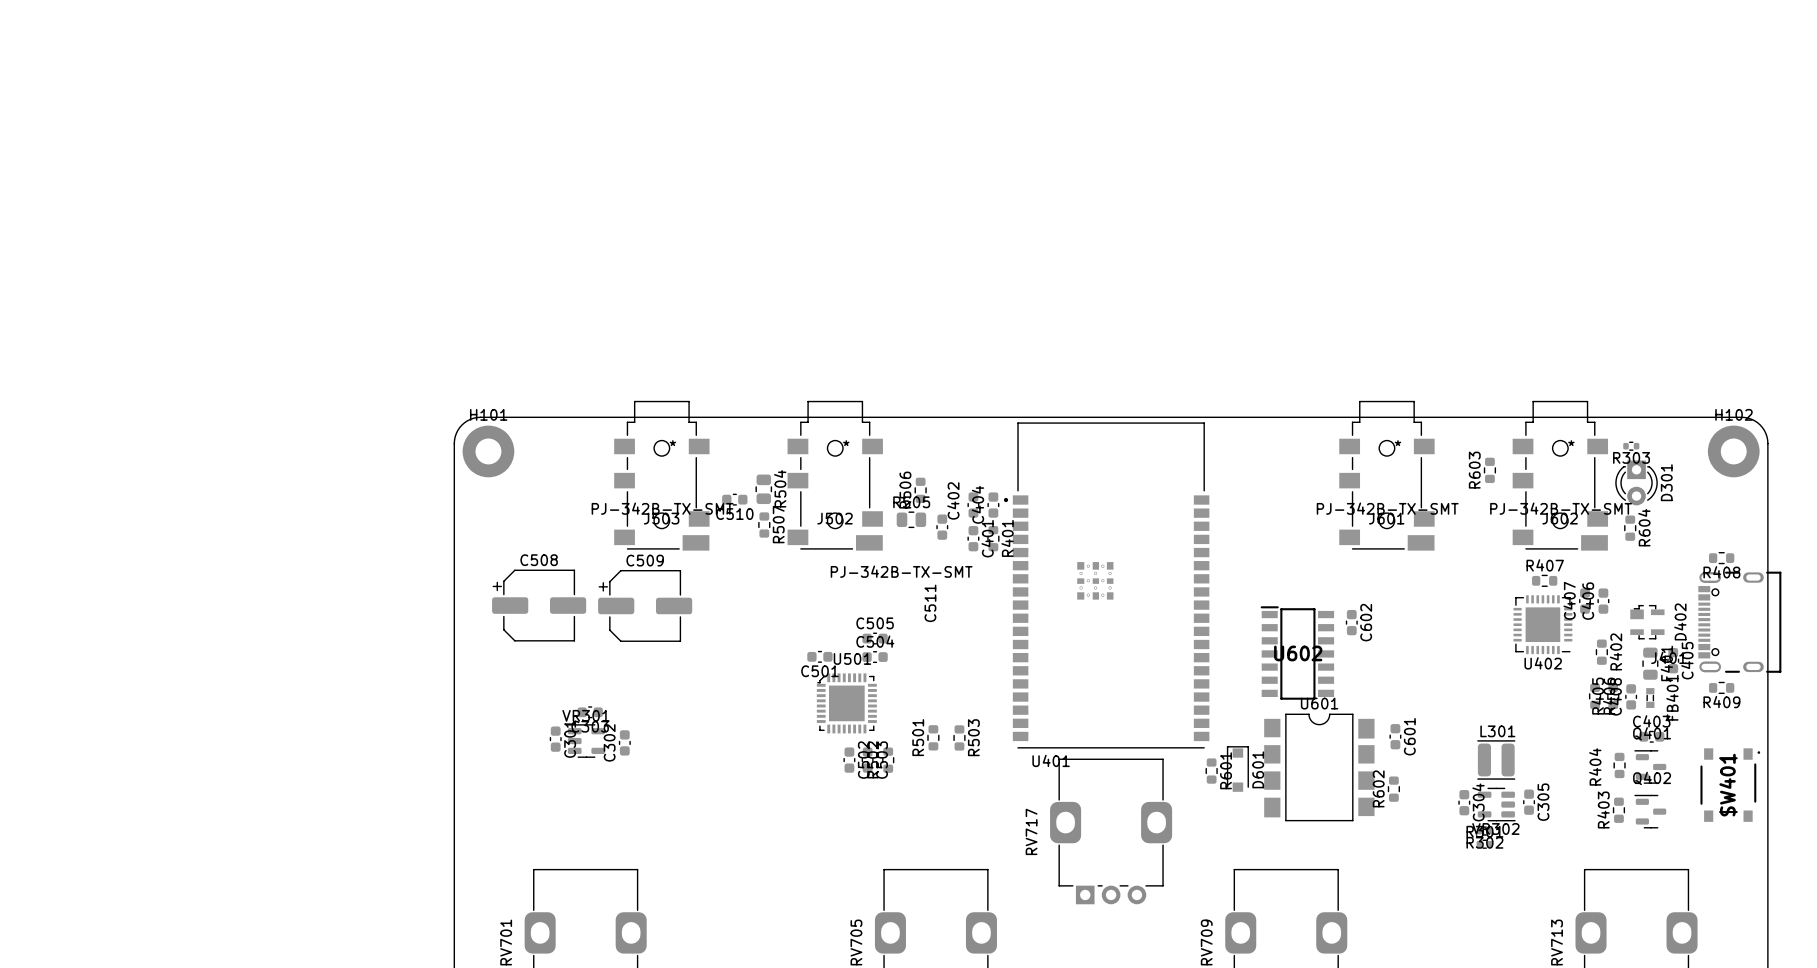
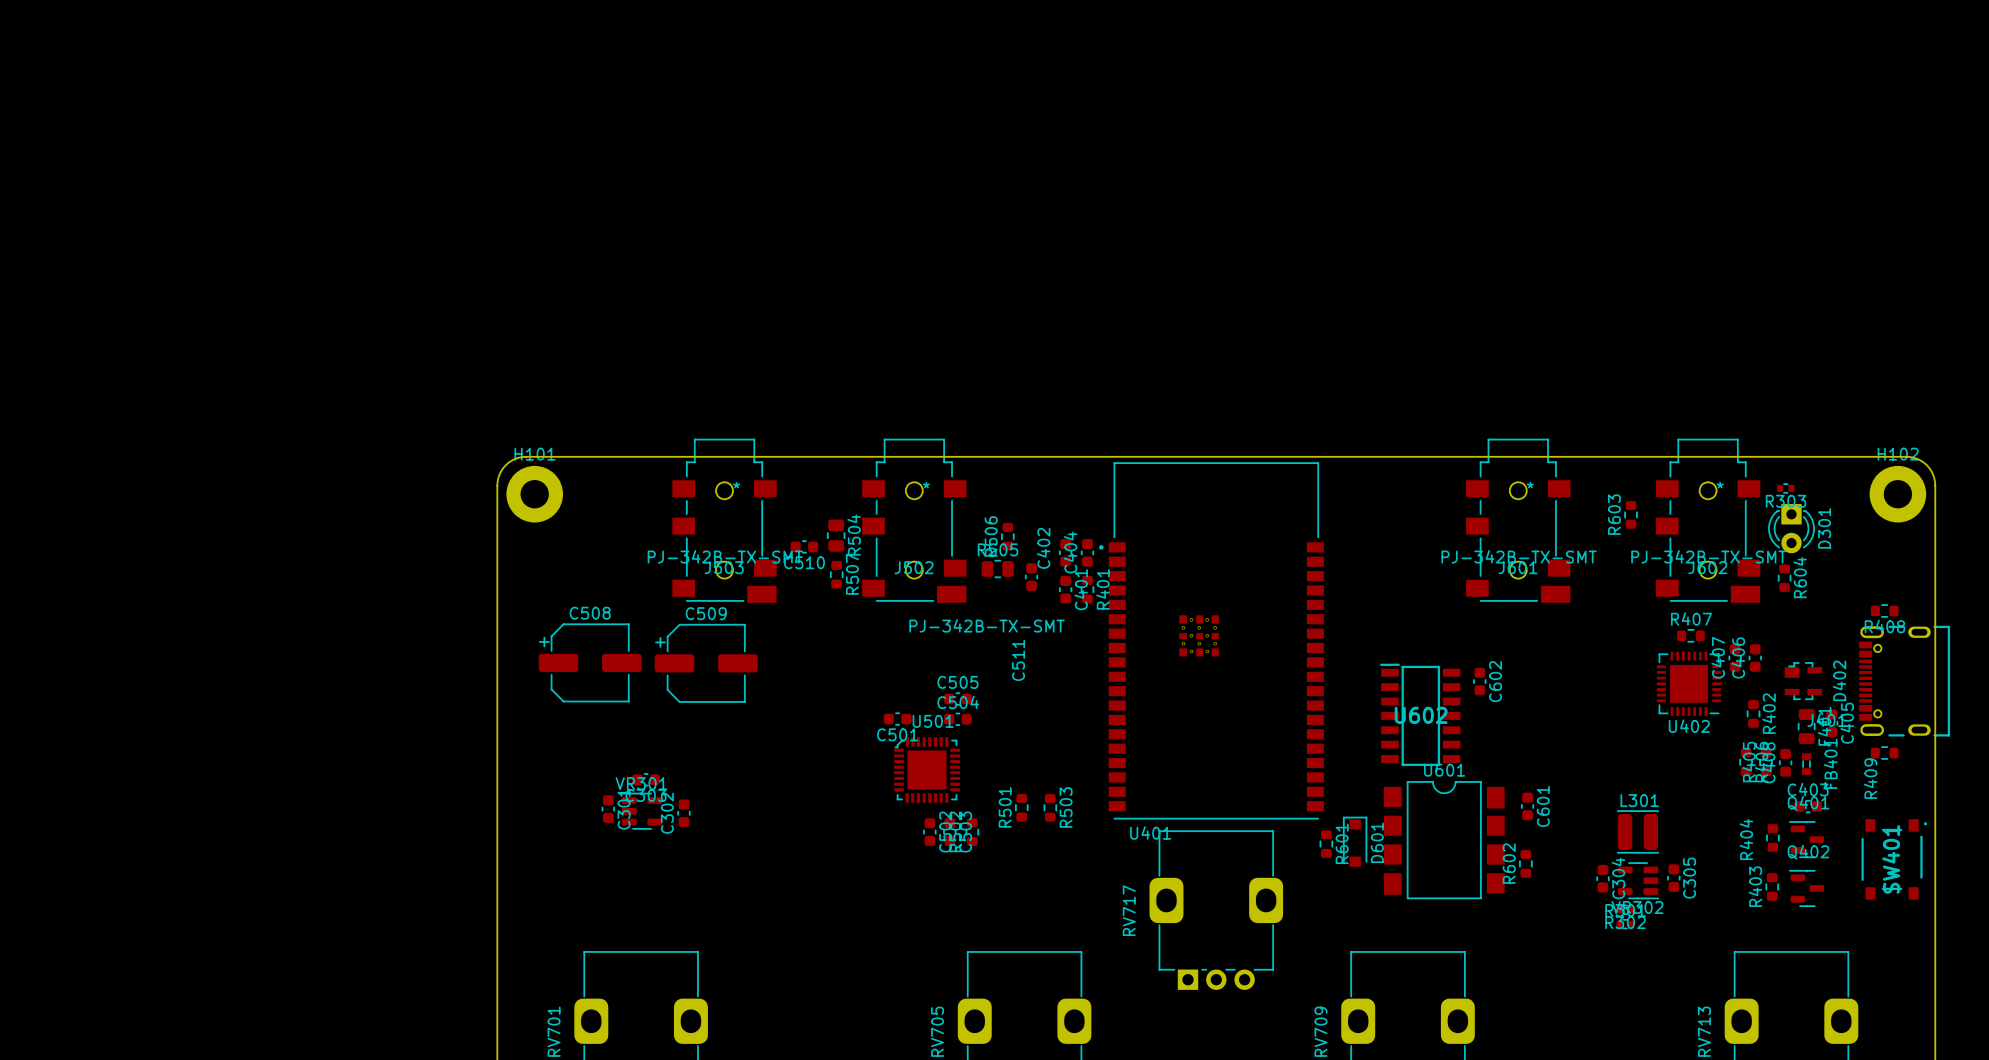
R409 name rotation: 0° (1721, 702) -> 90° counterclockwise (1870, 778)

